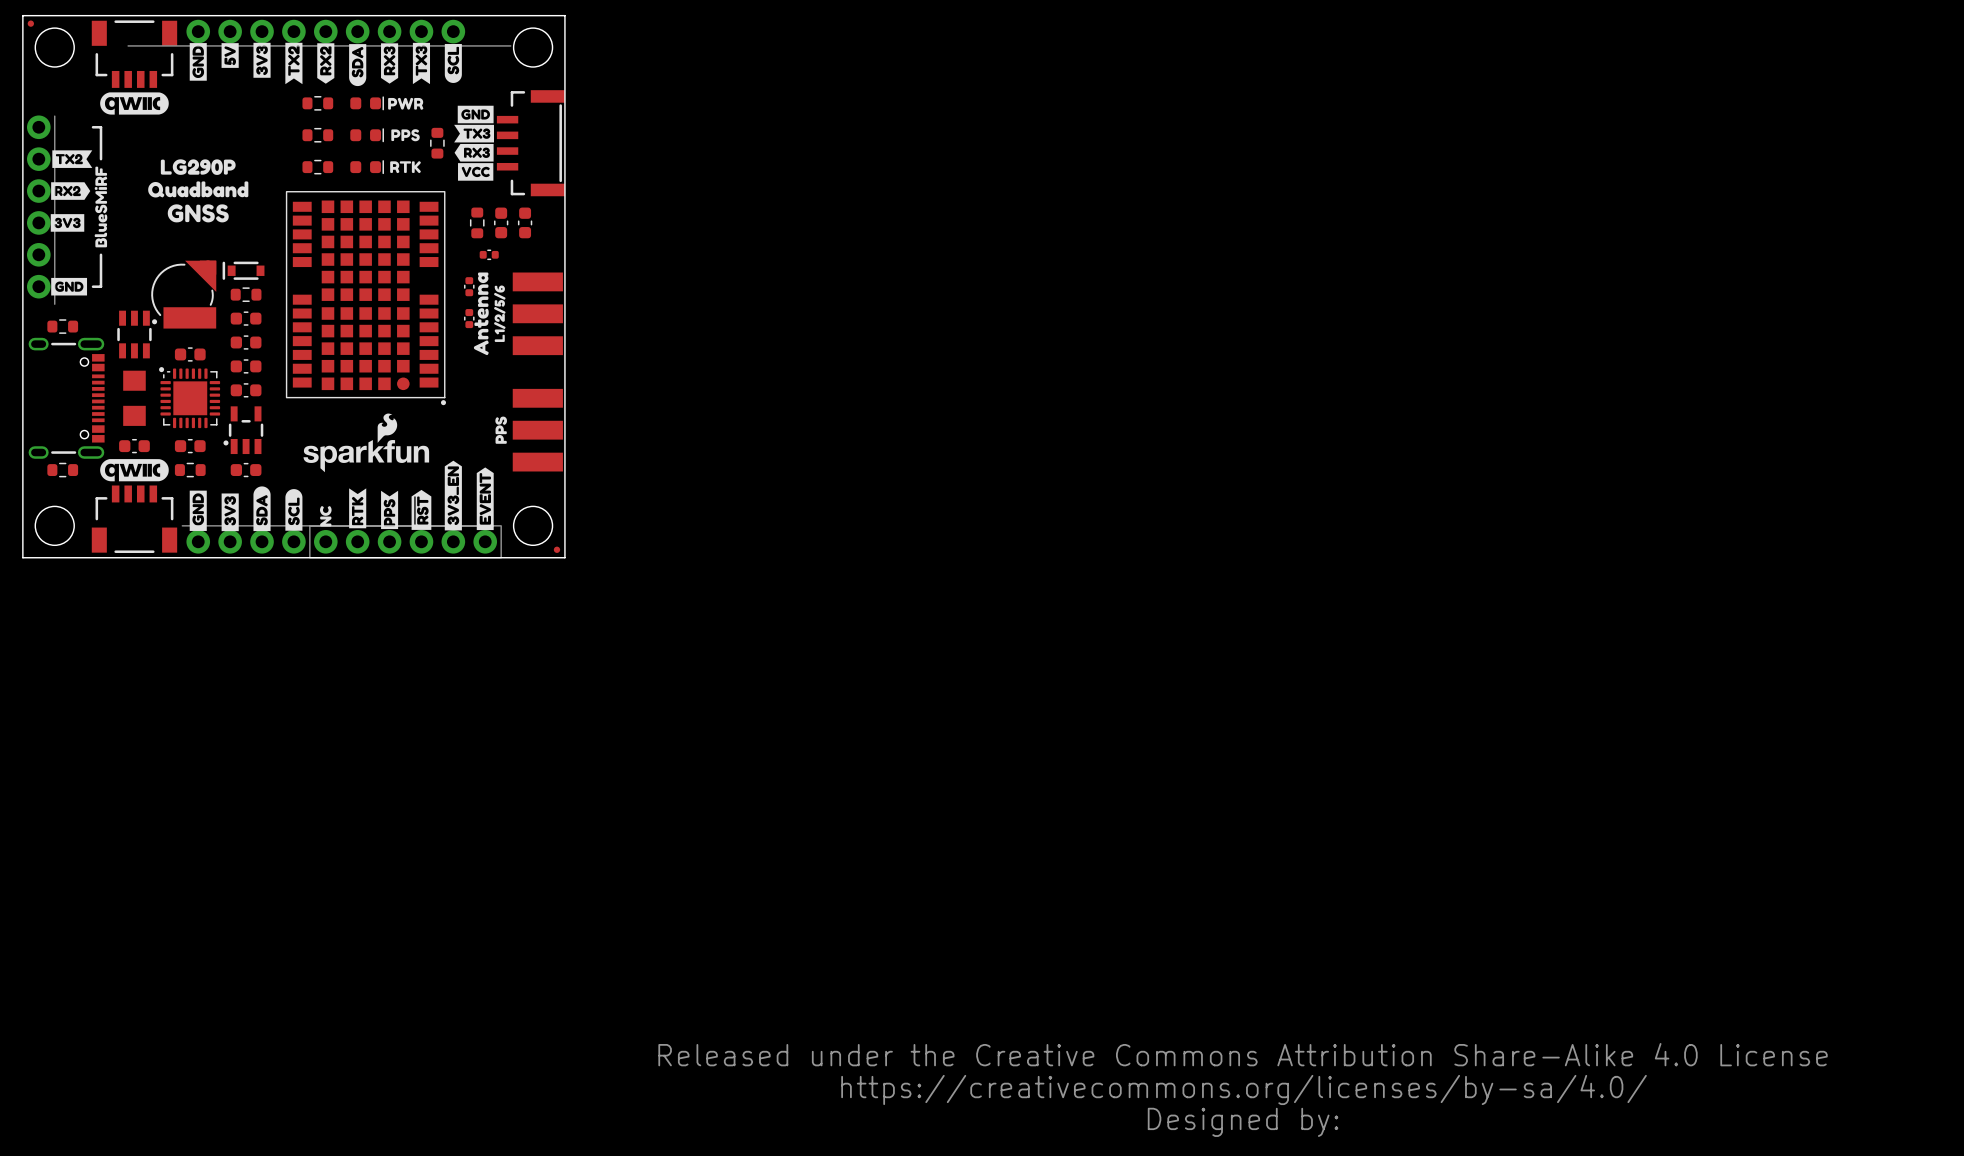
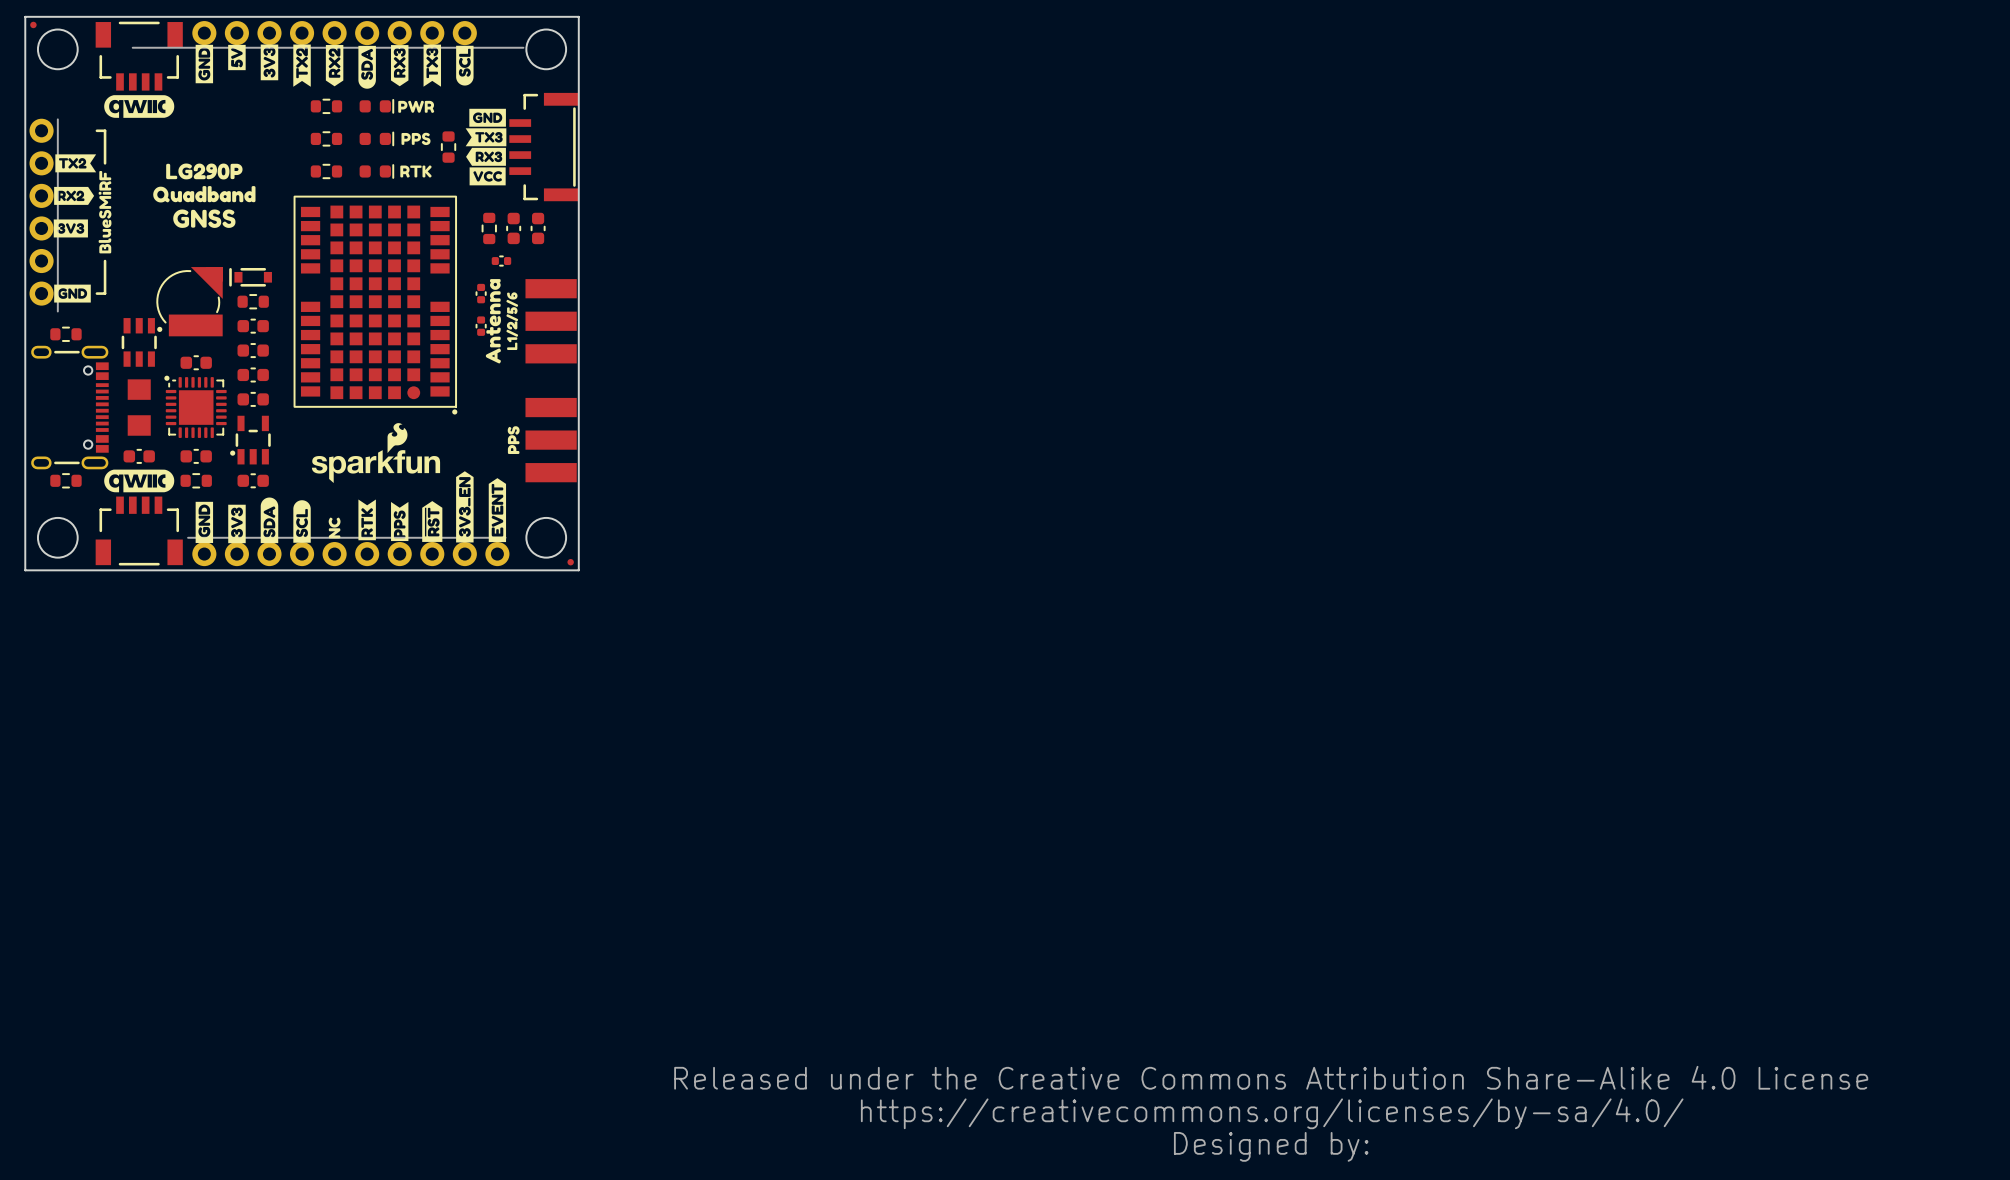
part footprint: [309, 525, 502, 559] -> [322, 542, 510, 567]

